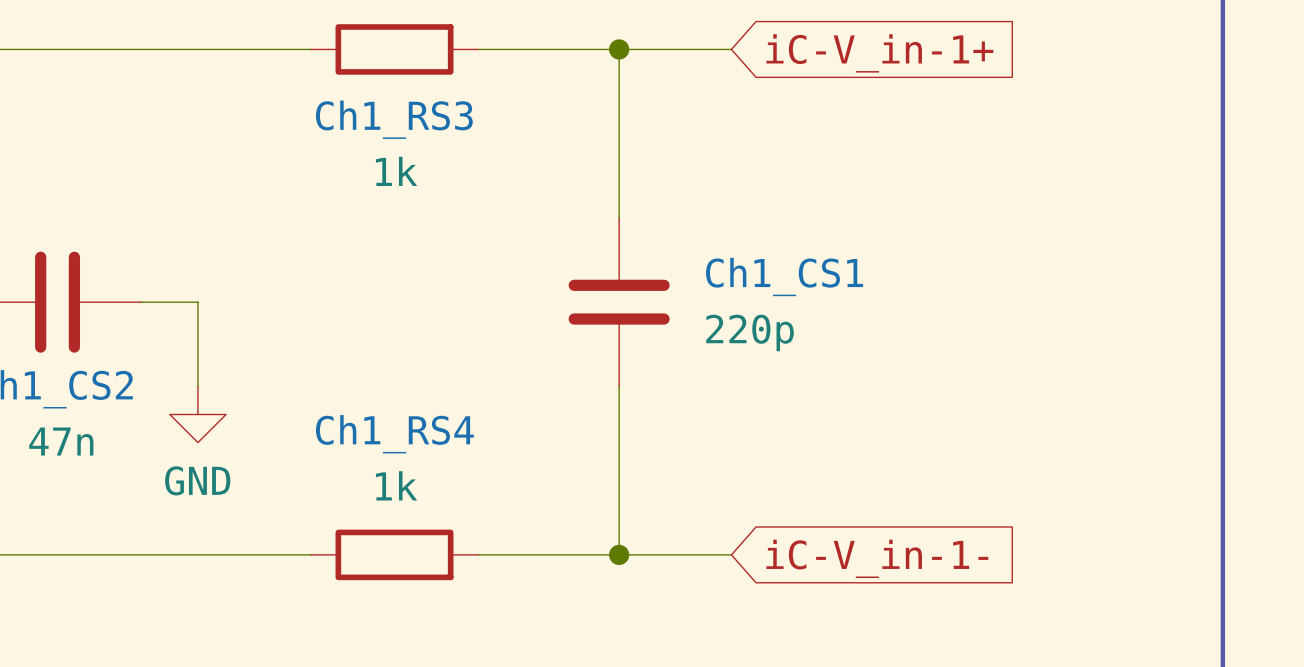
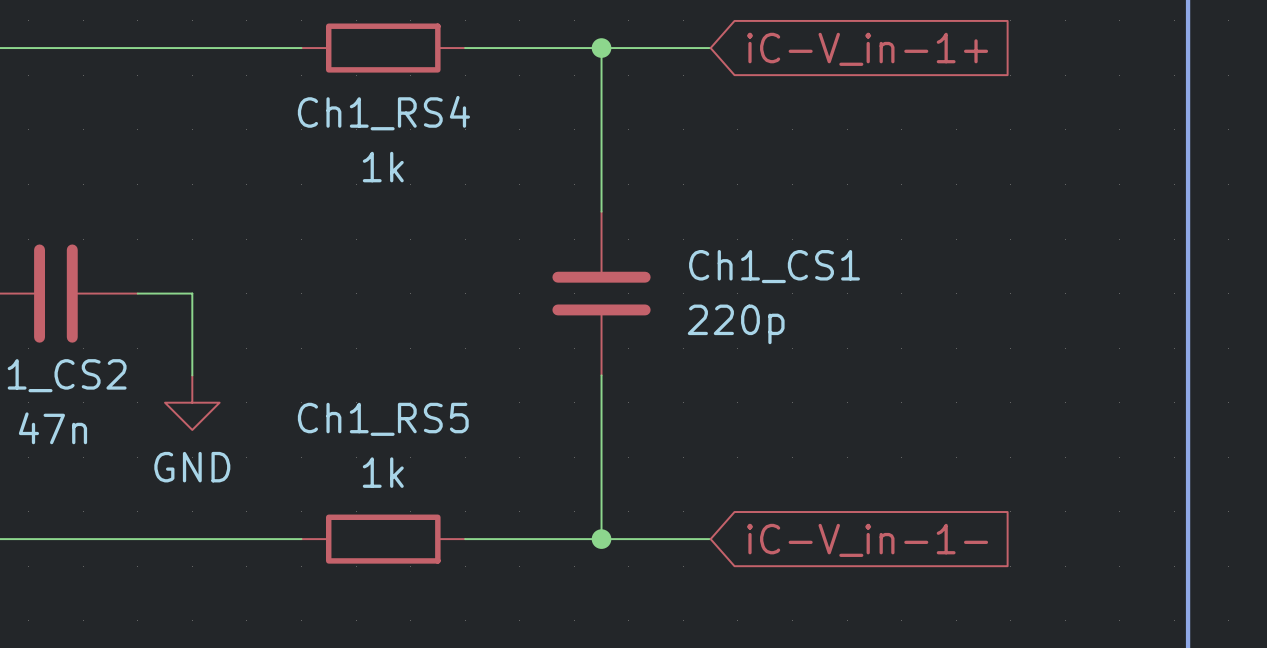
Ch1_RS3 name: Ch1_RS3 (394, 119) -> Ch1_RS4 (383, 113)
Ch1_RS4 name: Ch1_RS4 (394, 434) -> Ch1_RS5 (383, 419)

